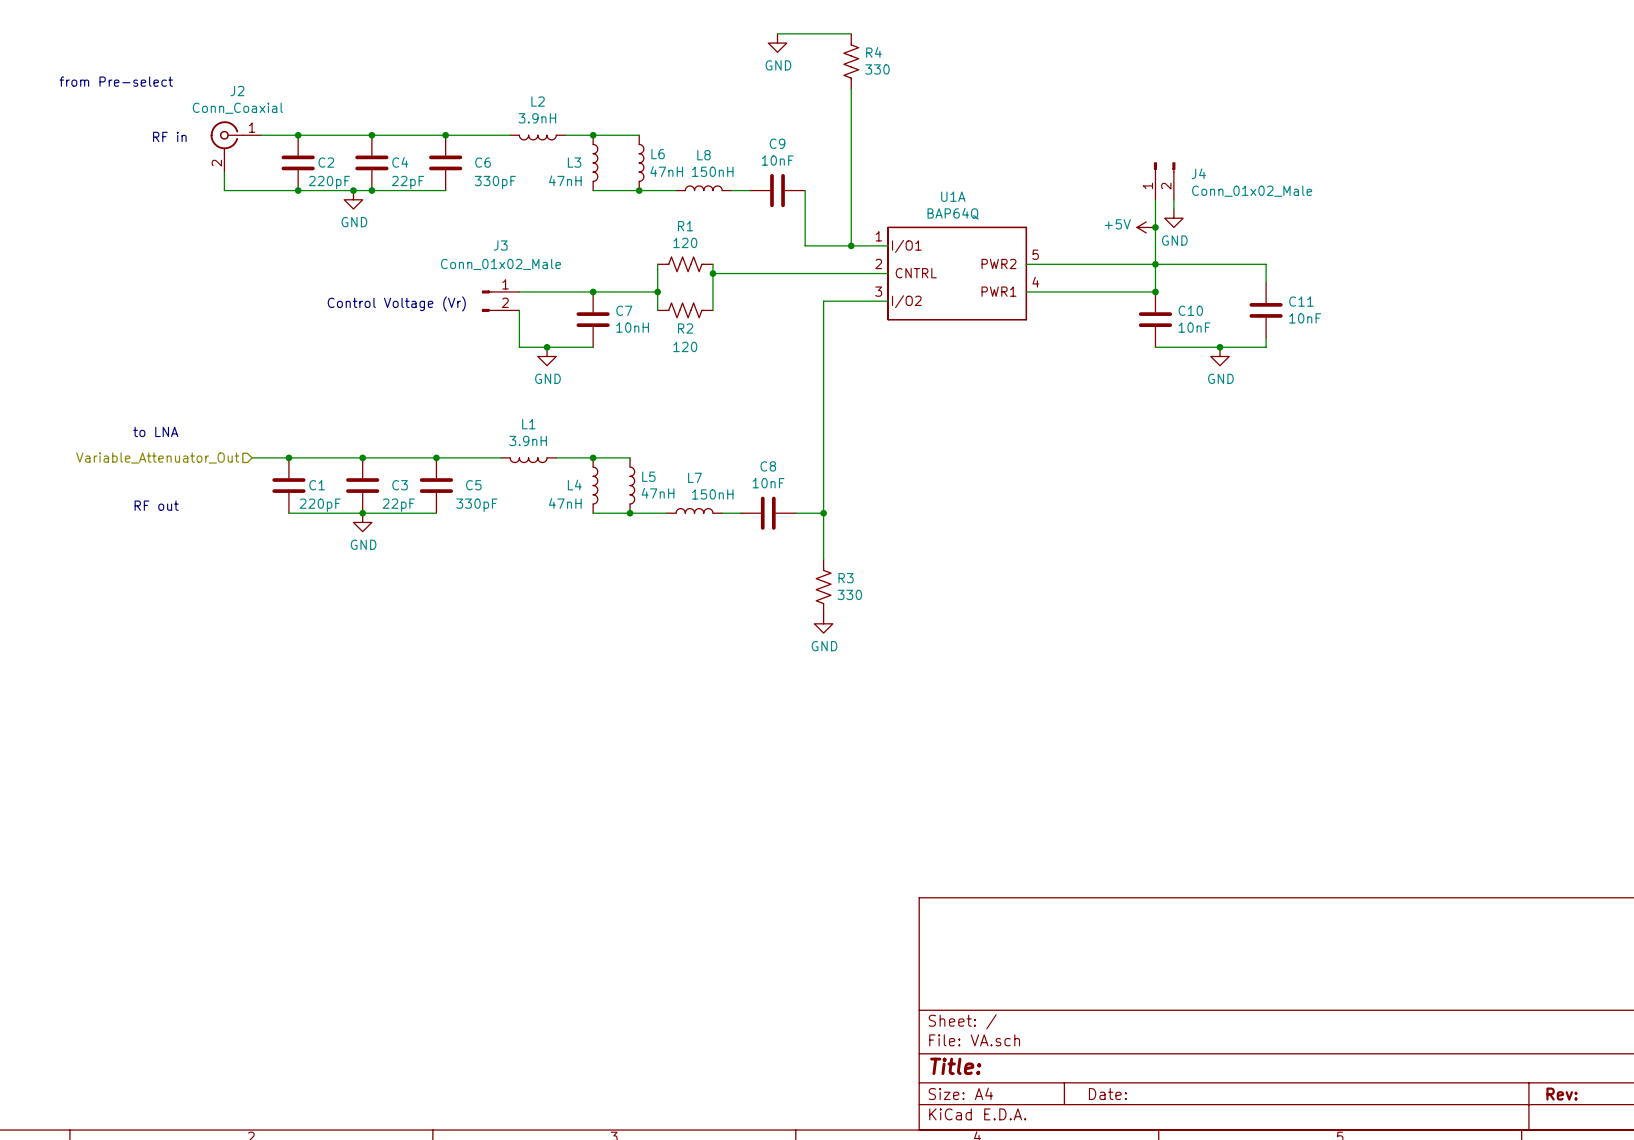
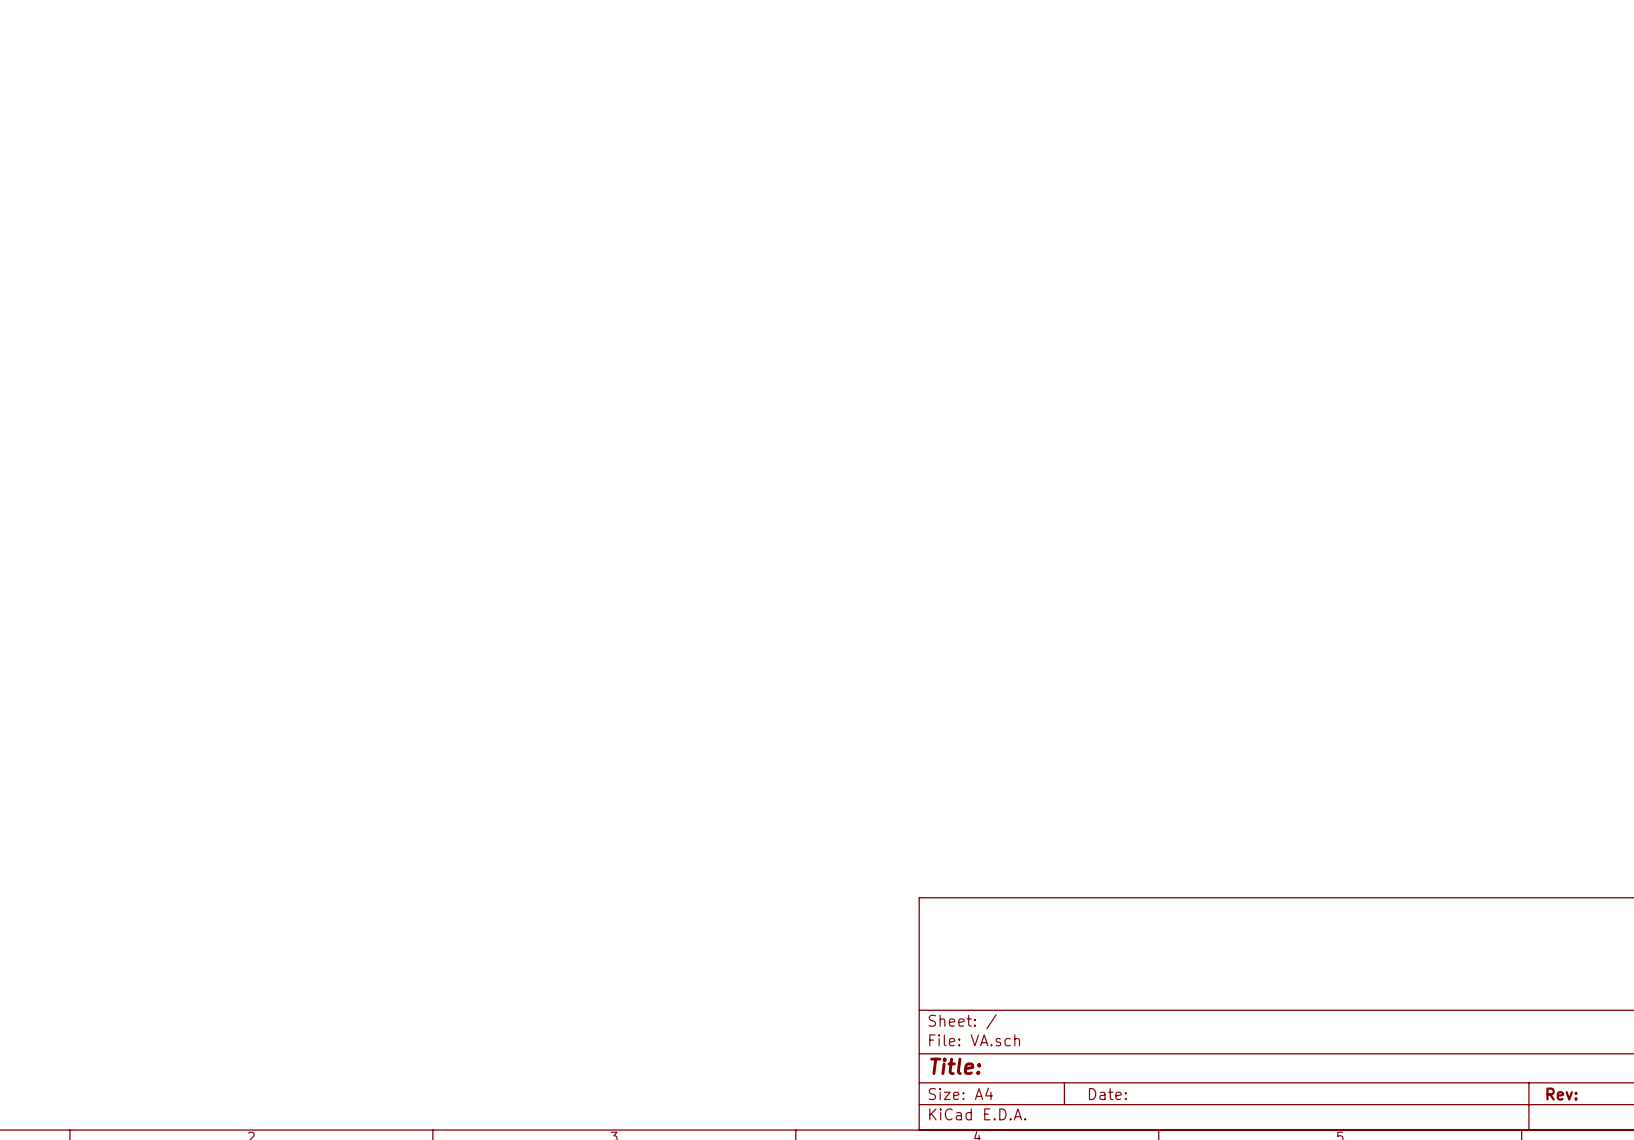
wire: (777, 33) (851, 33) -> none
power symbol: GND (777, 43) -> none
R4: 330 (851, 61) -> none
text: from Pre-select (116, 81) -> none
wire: (851, 89) (851, 245) -> none
wire: (261, 135) (510, 135) -> none
junction: (298, 135) -> none
junction: (371, 135) -> none
junction: (445, 135) -> none
wire: (565, 135) (639, 135) -> none
junction: (593, 135) -> none
text: RF in (169, 136) -> none
L2: 3.9nH (537, 137) -> none
J2: Conn_Coaxial (235, 146) -> none
C2: 220pF (298, 162) -> none
C4: 22pF (371, 162) -> none
C6: 330pF (445, 162) -> none
L3: 47nH (595, 162) -> none
L6: 47nH (641, 162) -> none
wire: (224, 172) (224, 190) (445, 190) -> none
J4: Conn_01x02_Male (1164, 181) -> none
L8: 150nH (703, 188) -> none
junction: (298, 190) -> none
junction: (353, 190) -> none
junction: (371, 190) -> none
wire: (593, 190) (676, 190) -> none
junction: (639, 190) -> none
wire: (731, 190) (749, 190) -> none
C9: 10nF (777, 190) -> none
wire: (805, 190) (805, 245) (888, 245) -> none
power symbol: GND (353, 199) -> none
wire: (1155, 199) (1155, 291) (1026, 291) -> none
wire: (1173, 199) (1173, 209) -> none
power symbol: GND (1173, 218) -> none
power symbol: +5V (1146, 227) -> none
junction: (1155, 227) -> none
junction: (851, 245) -> none
wire: (657, 264) (657, 310) -> none
R1: 120 (685, 264) -> none
wire: (712, 264) (712, 310) -> none
wire: (1026, 264) (1266, 264) (1266, 282) -> none
junction: (1155, 264) -> none
wire: (712, 273) (888, 273) -> none
junction: (712, 273) -> none
U1A: BAP64Q (957, 273) -> none
wire: (519, 291) (657, 291) -> none
junction: (593, 291) -> none
junction: (657, 291) -> none
junction: (1155, 291) -> none
J3: Conn_01x02_Male (500, 301) -> none
wire: (888, 301) (823, 301) (823, 559) -> none
text: Control Voltage (Vr) (396, 303) -> none
wire: (519, 310) (519, 347) (593, 347) -> none
R2: 120 (685, 310) -> none
C11: 10nF (1266, 310) -> none
C7: 10nH (593, 319) -> none
C10: 10nF (1155, 319) -> none
wire: (1266, 338) (1266, 347) (1155, 347) -> none
junction: (547, 347) -> none
junction: (1220, 347) -> none
power symbol: GND (547, 356) -> none
power symbol: GND (1220, 356) -> none
text: to LNA (155, 431) -> none
wire: (252, 457) (500, 457) -> none
junction: (288, 457) -> none
junction: (362, 457) -> none
junction: (436, 457) -> none
wire: (556, 457) (630, 457) -> none
junction: (593, 457) -> none
hierarchical label: Variable_Attenuator_Out (157, 458) -> none
L1: 3.9nH (528, 460) -> none
C1: 220pF (288, 485) -> none
C3: 22pF (362, 485) -> none
C5: 330pF (436, 485) -> none
L4: 47nH (595, 485) -> none
L5: 47nH (632, 485) -> none
text: RF out (156, 505) -> none
L7: 150nH (694, 510) -> none
wire: (288, 513) (436, 513) -> none
junction: (362, 513) -> none
wire: (593, 513) (666, 513) -> none
junction: (630, 513) -> none
wire: (722, 513) (740, 513) -> none
C8: 10nF (768, 513) -> none
wire: (795, 513) (823, 513) -> none
junction: (823, 513) -> none
power symbol: GND (362, 522) -> none
R3: 330 (823, 586) -> none
power symbol: GND (823, 623) -> none

